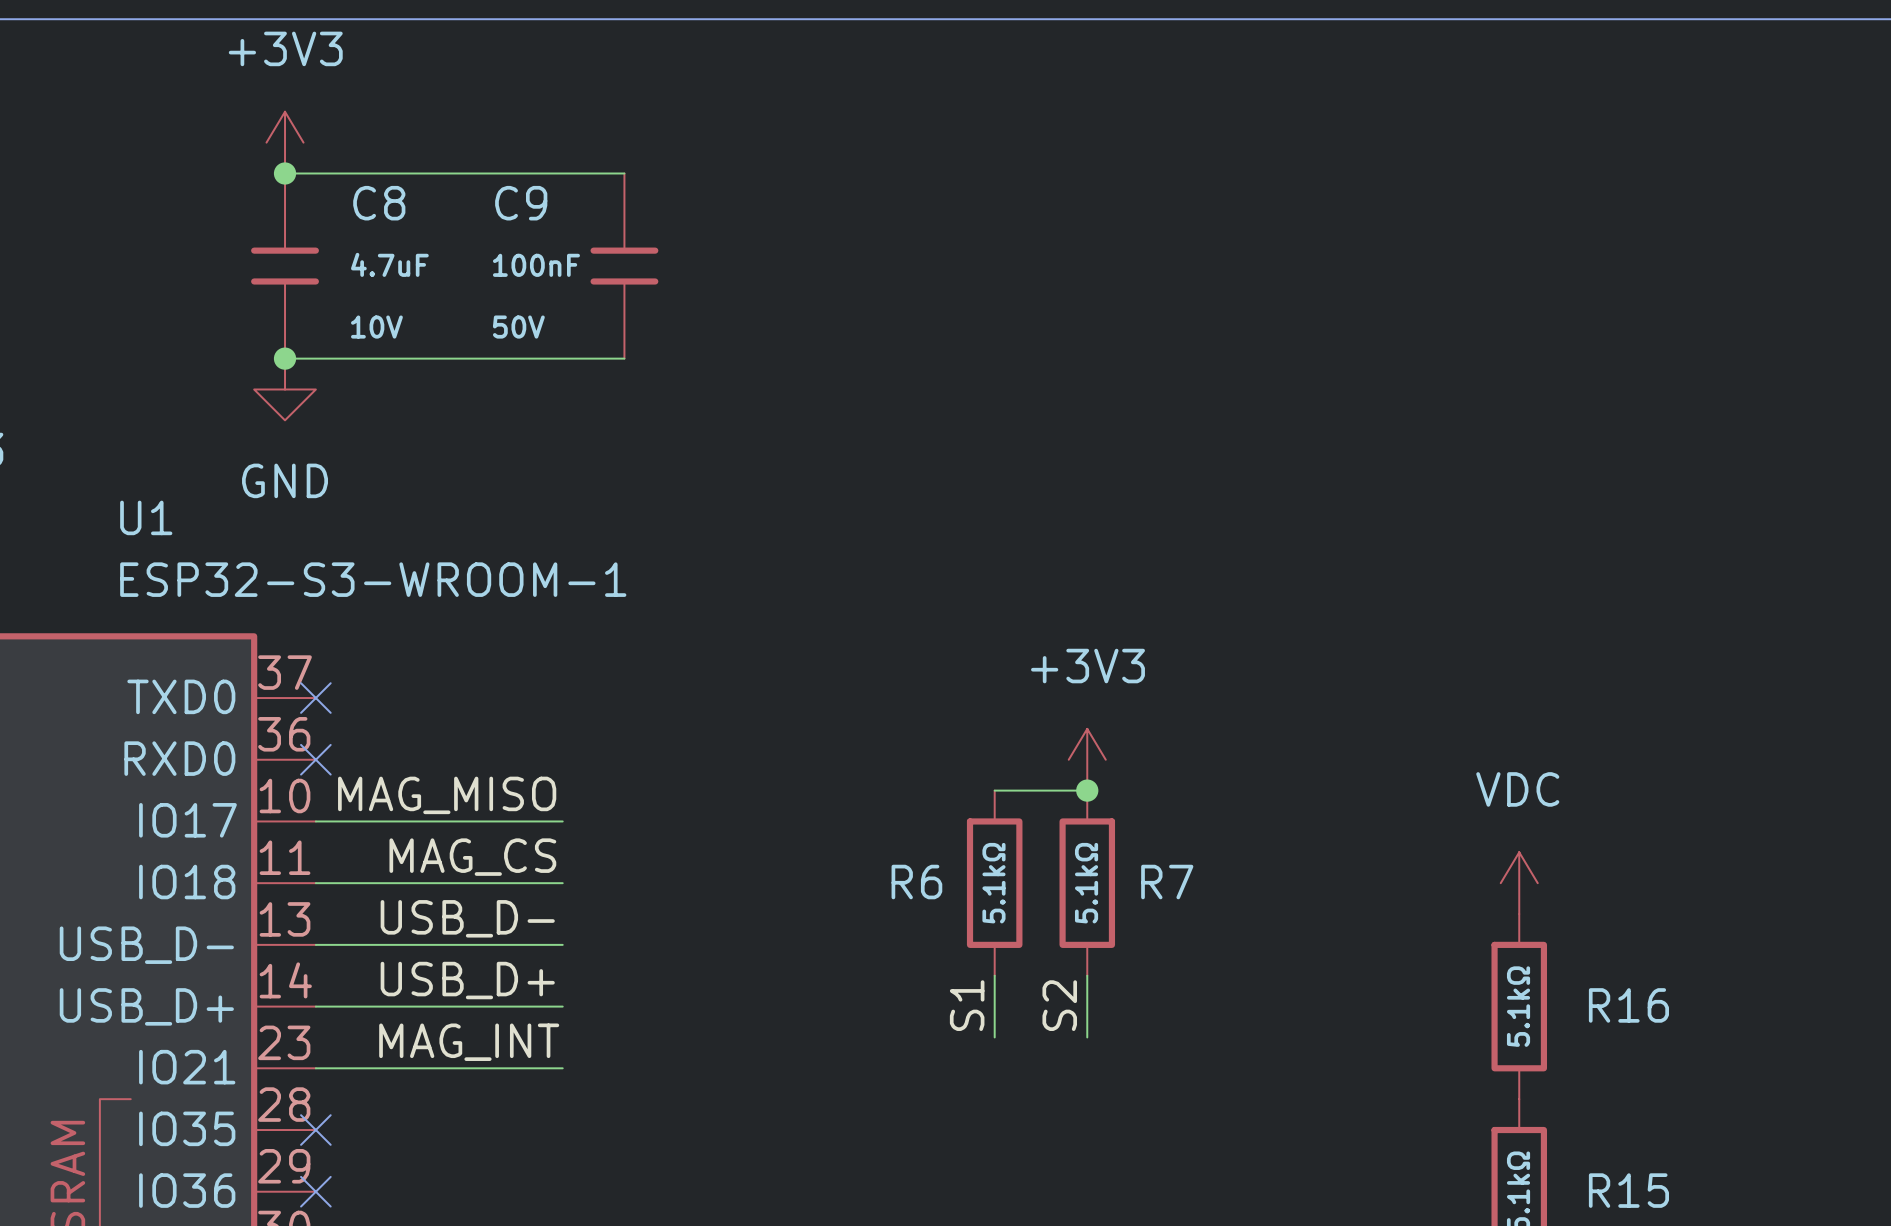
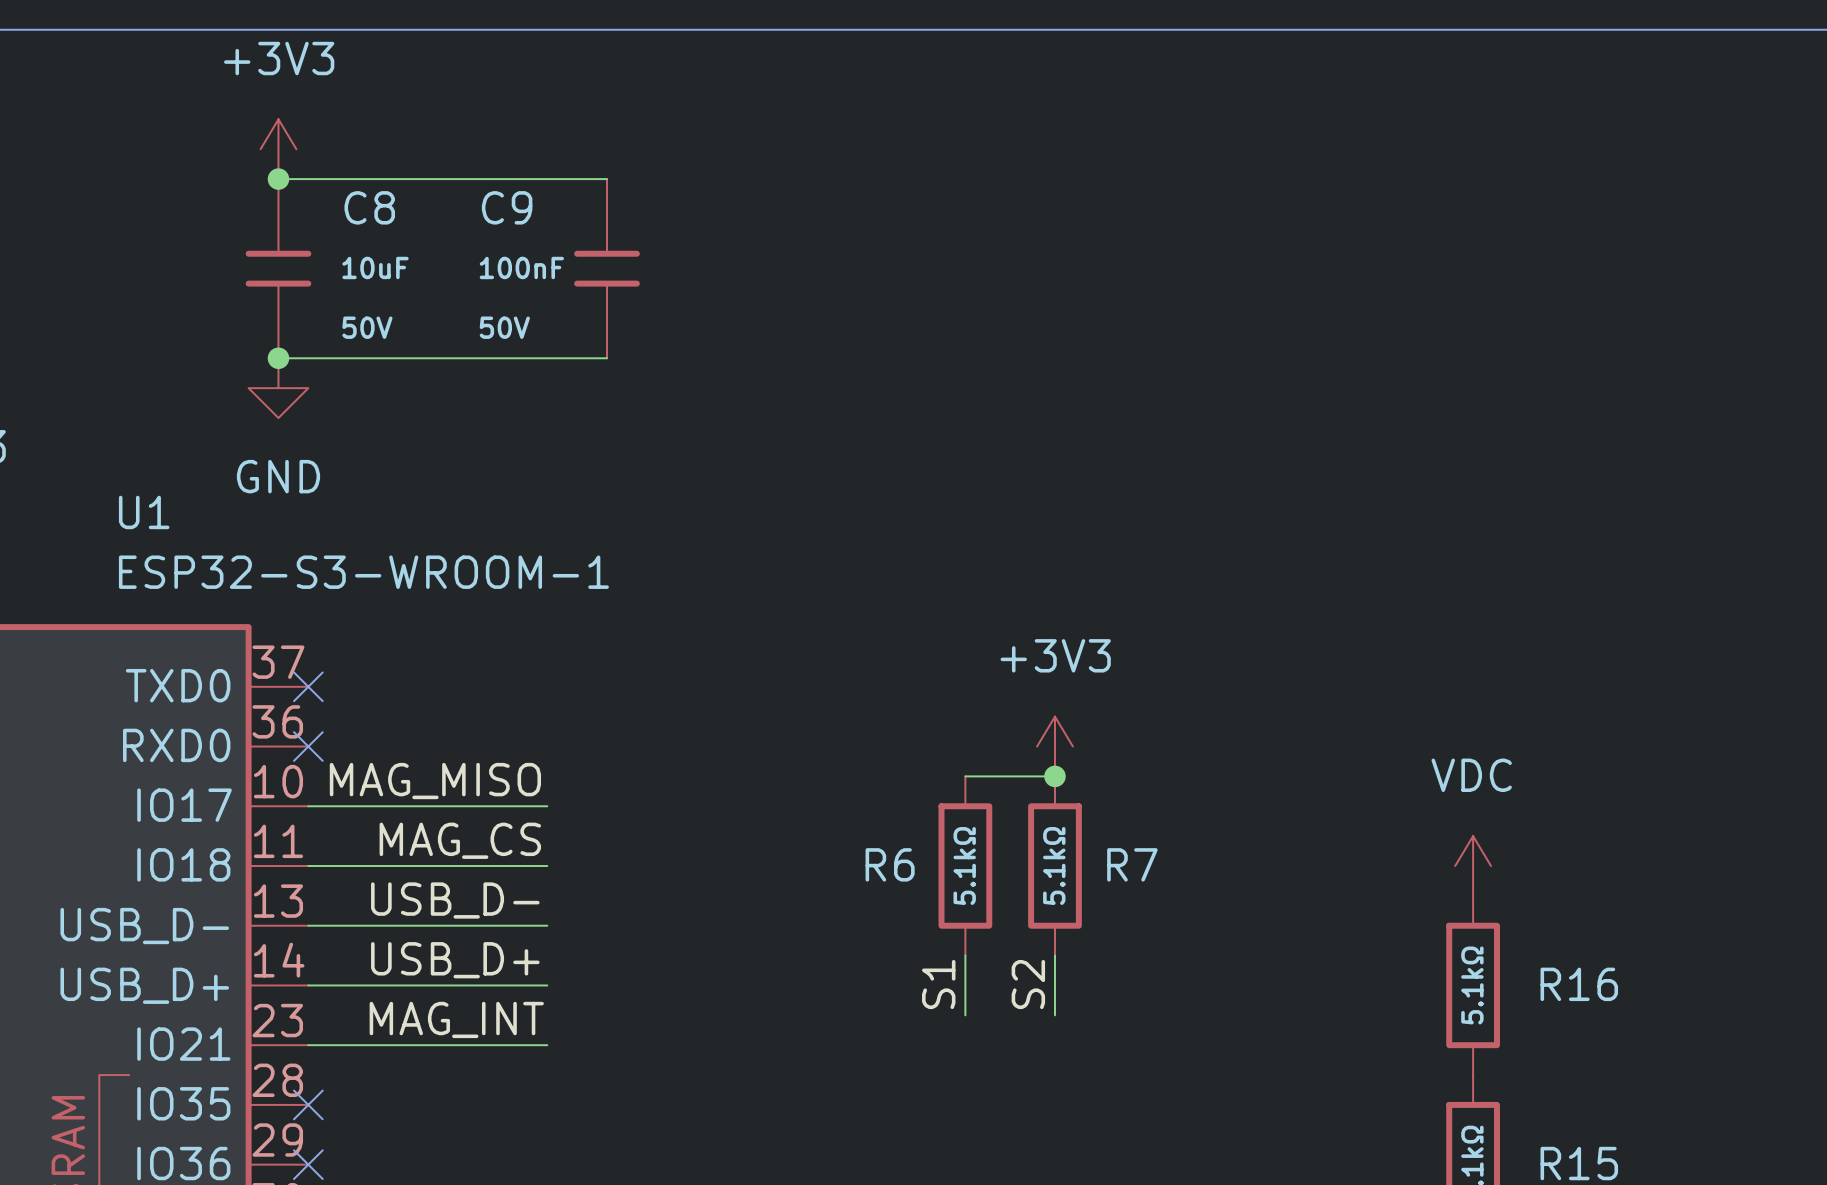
C8 value: 4.7uF (389, 264) -> 10uF (375, 267)
C8 text: 10V (376, 327) -> 50V (367, 327)

